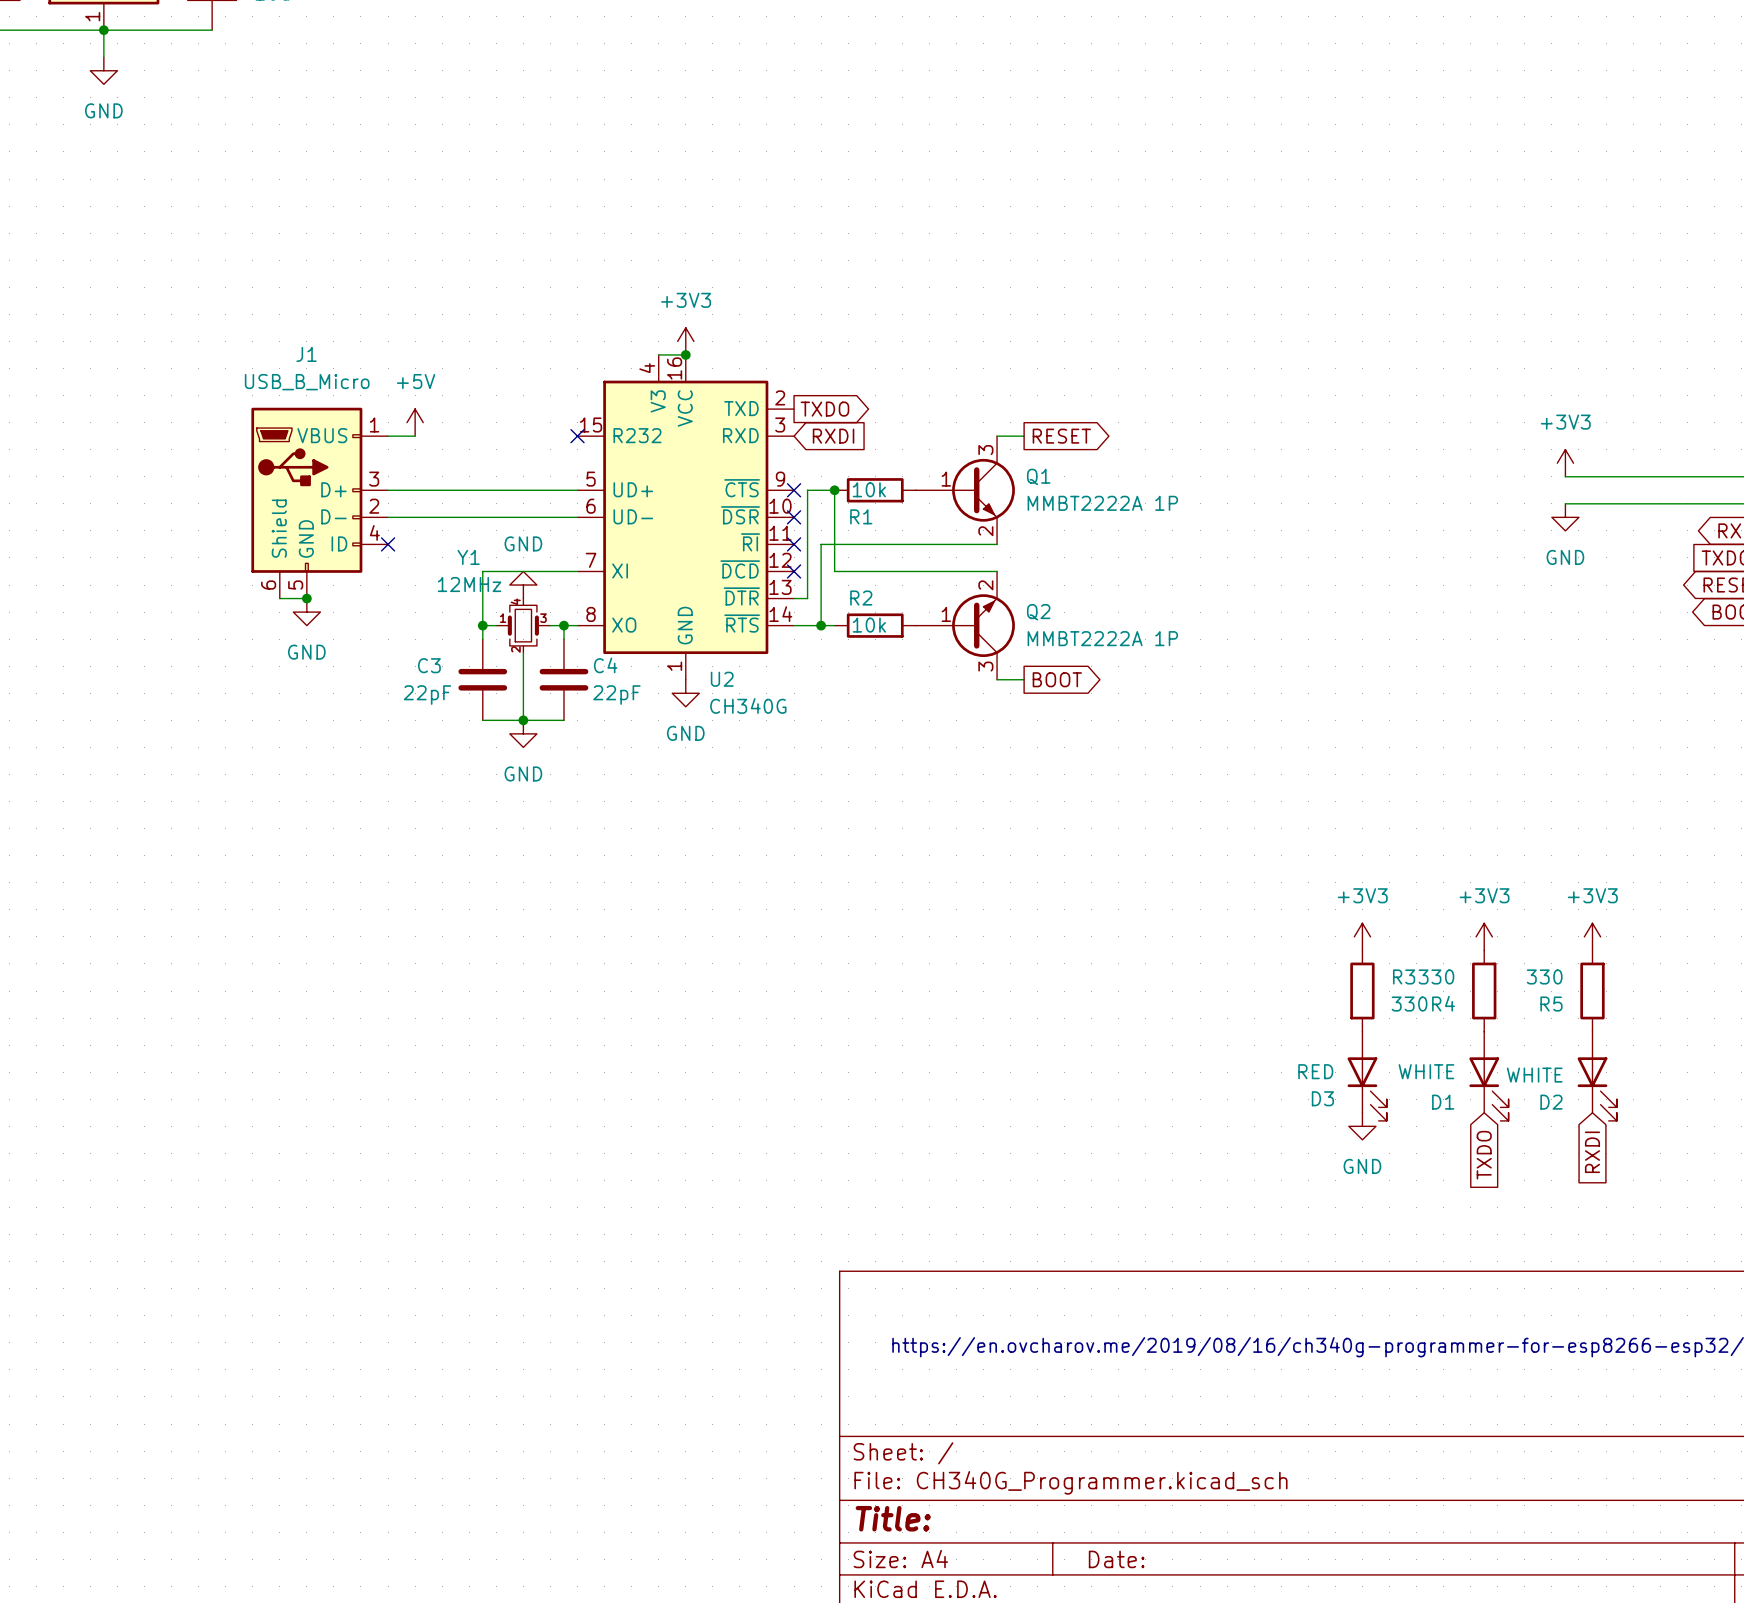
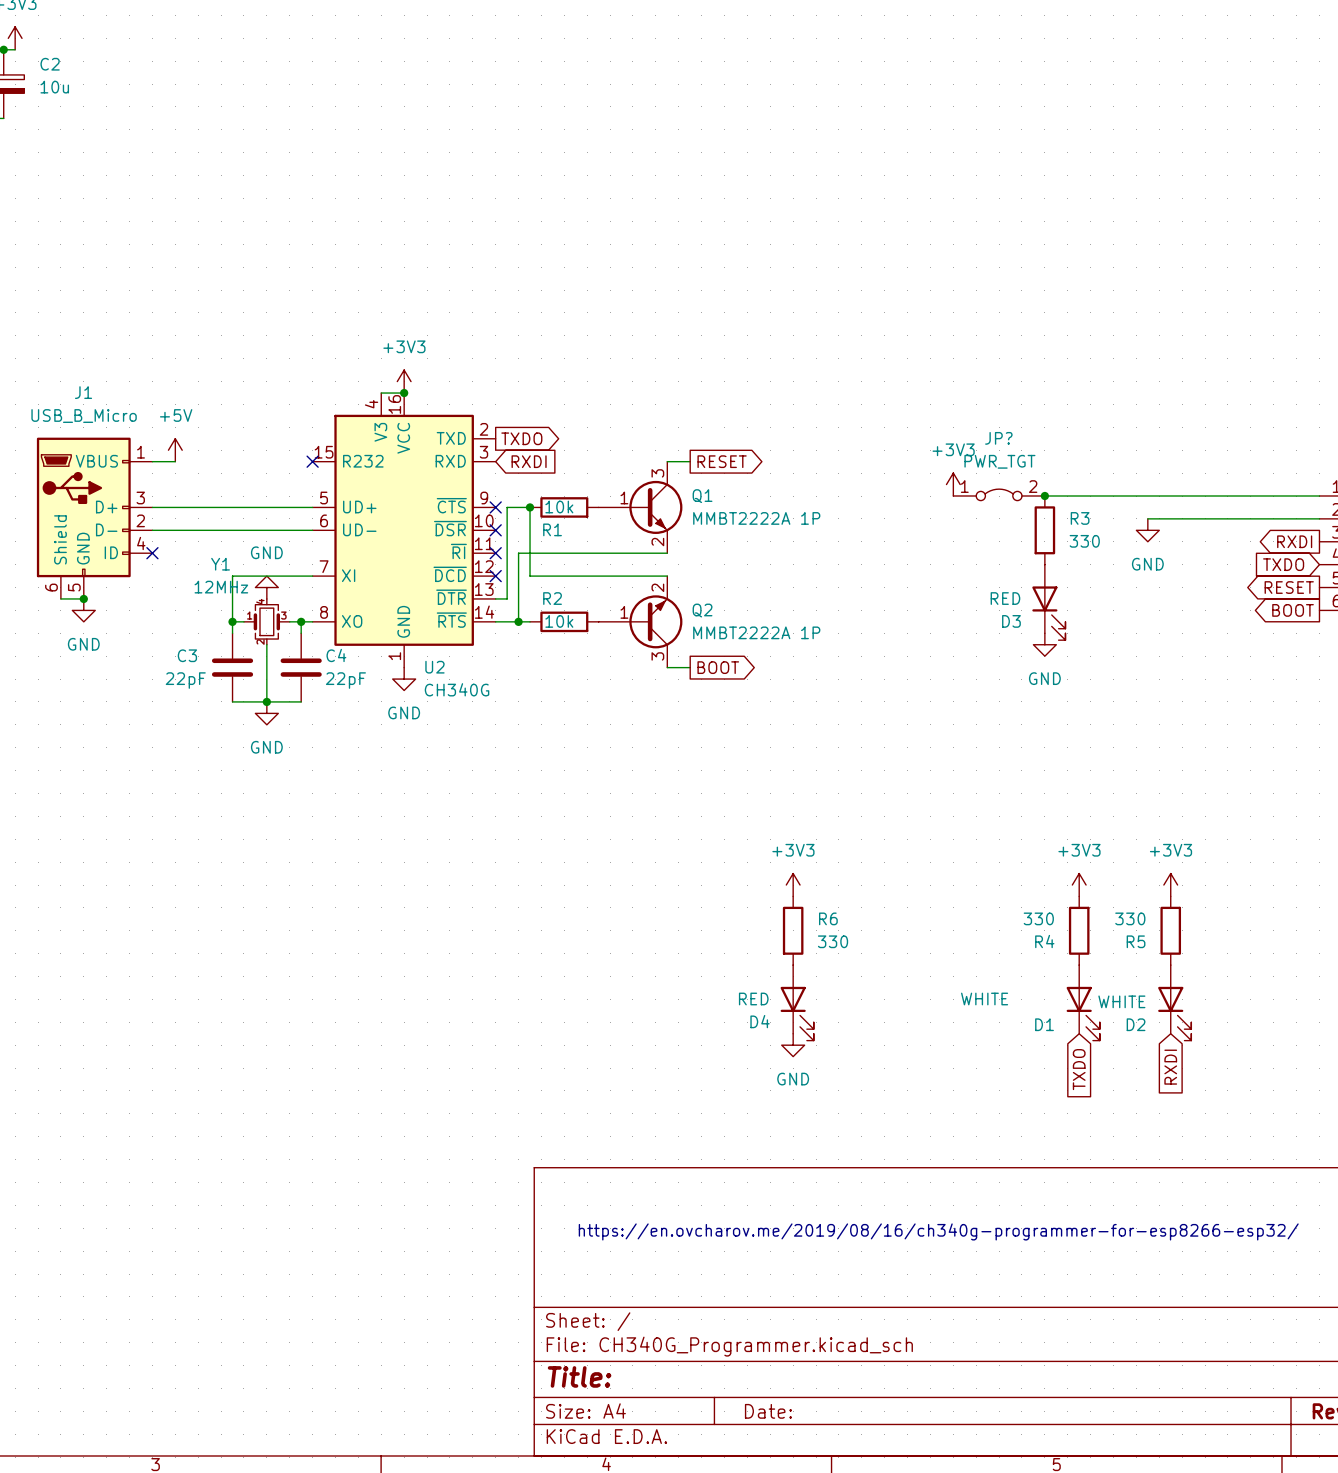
power symbol position: +3V3 (1565, 463) -> +3V3 (953, 484)
JP?: none -> PWR_TGT (999, 494)
wire: none -> (1044, 496) (1147, 496)
junction: none -> (1044, 496)
power symbol: none -> GND (1044, 644)
power symbol position: +3V3 (1362, 936) -> +3V3 (793, 885)
R6: none -> 330 (793, 930)
R3 position: (1362, 991) -> (1044, 530)
D1 value position: WHITE (1426, 1071) -> WHITE (984, 998)
D4: none -> RED (797, 1002)
D3 position: (1367, 1076) -> (1048, 602)
power symbol position: GND (1362, 1126) -> GND (793, 1045)

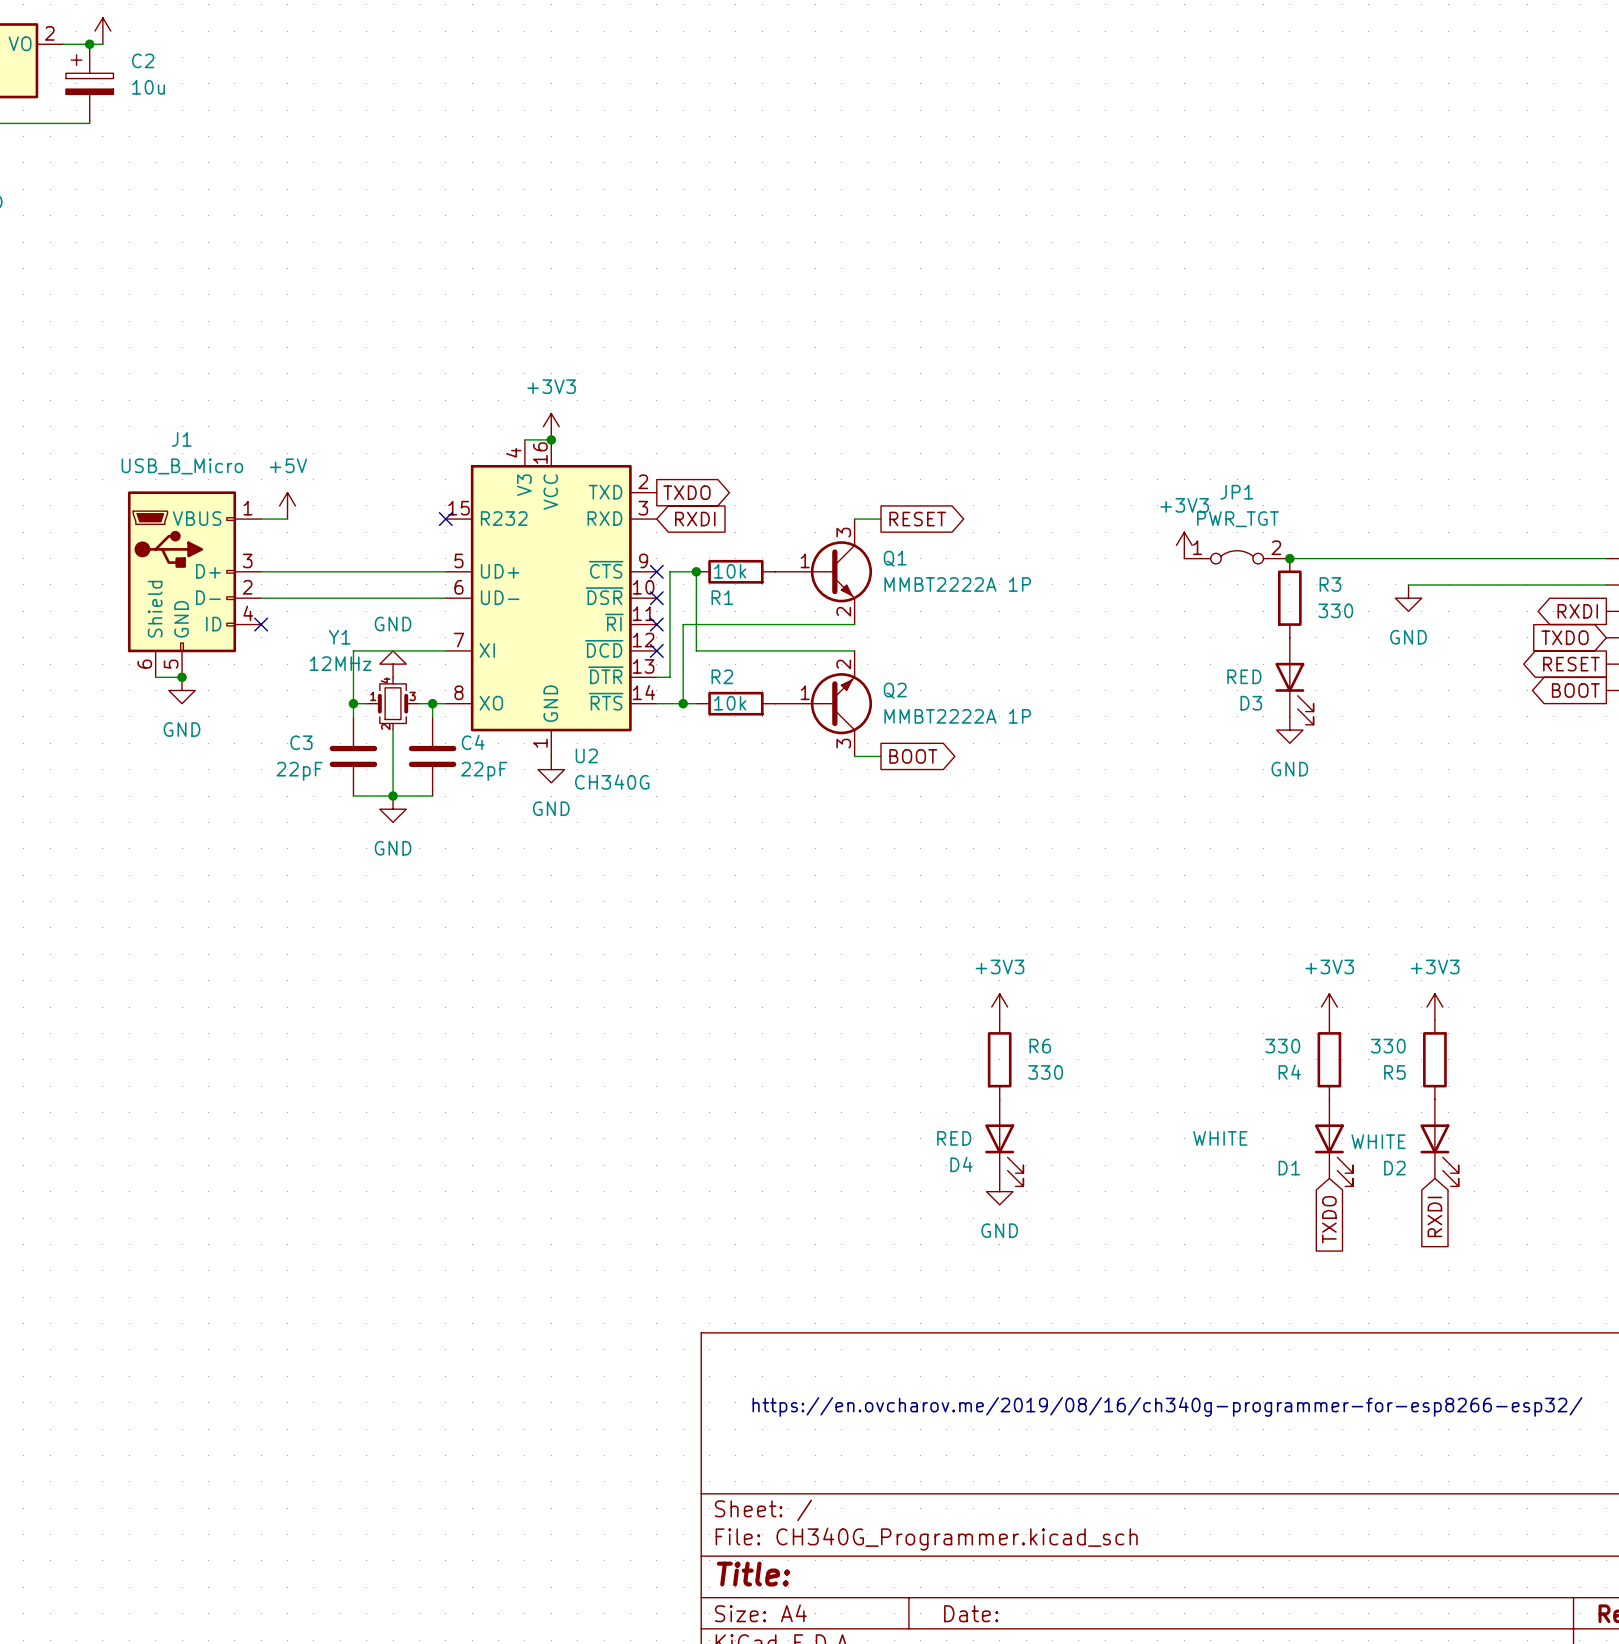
JP? name: JP? (998, 438) -> JP1 (1236, 492)

